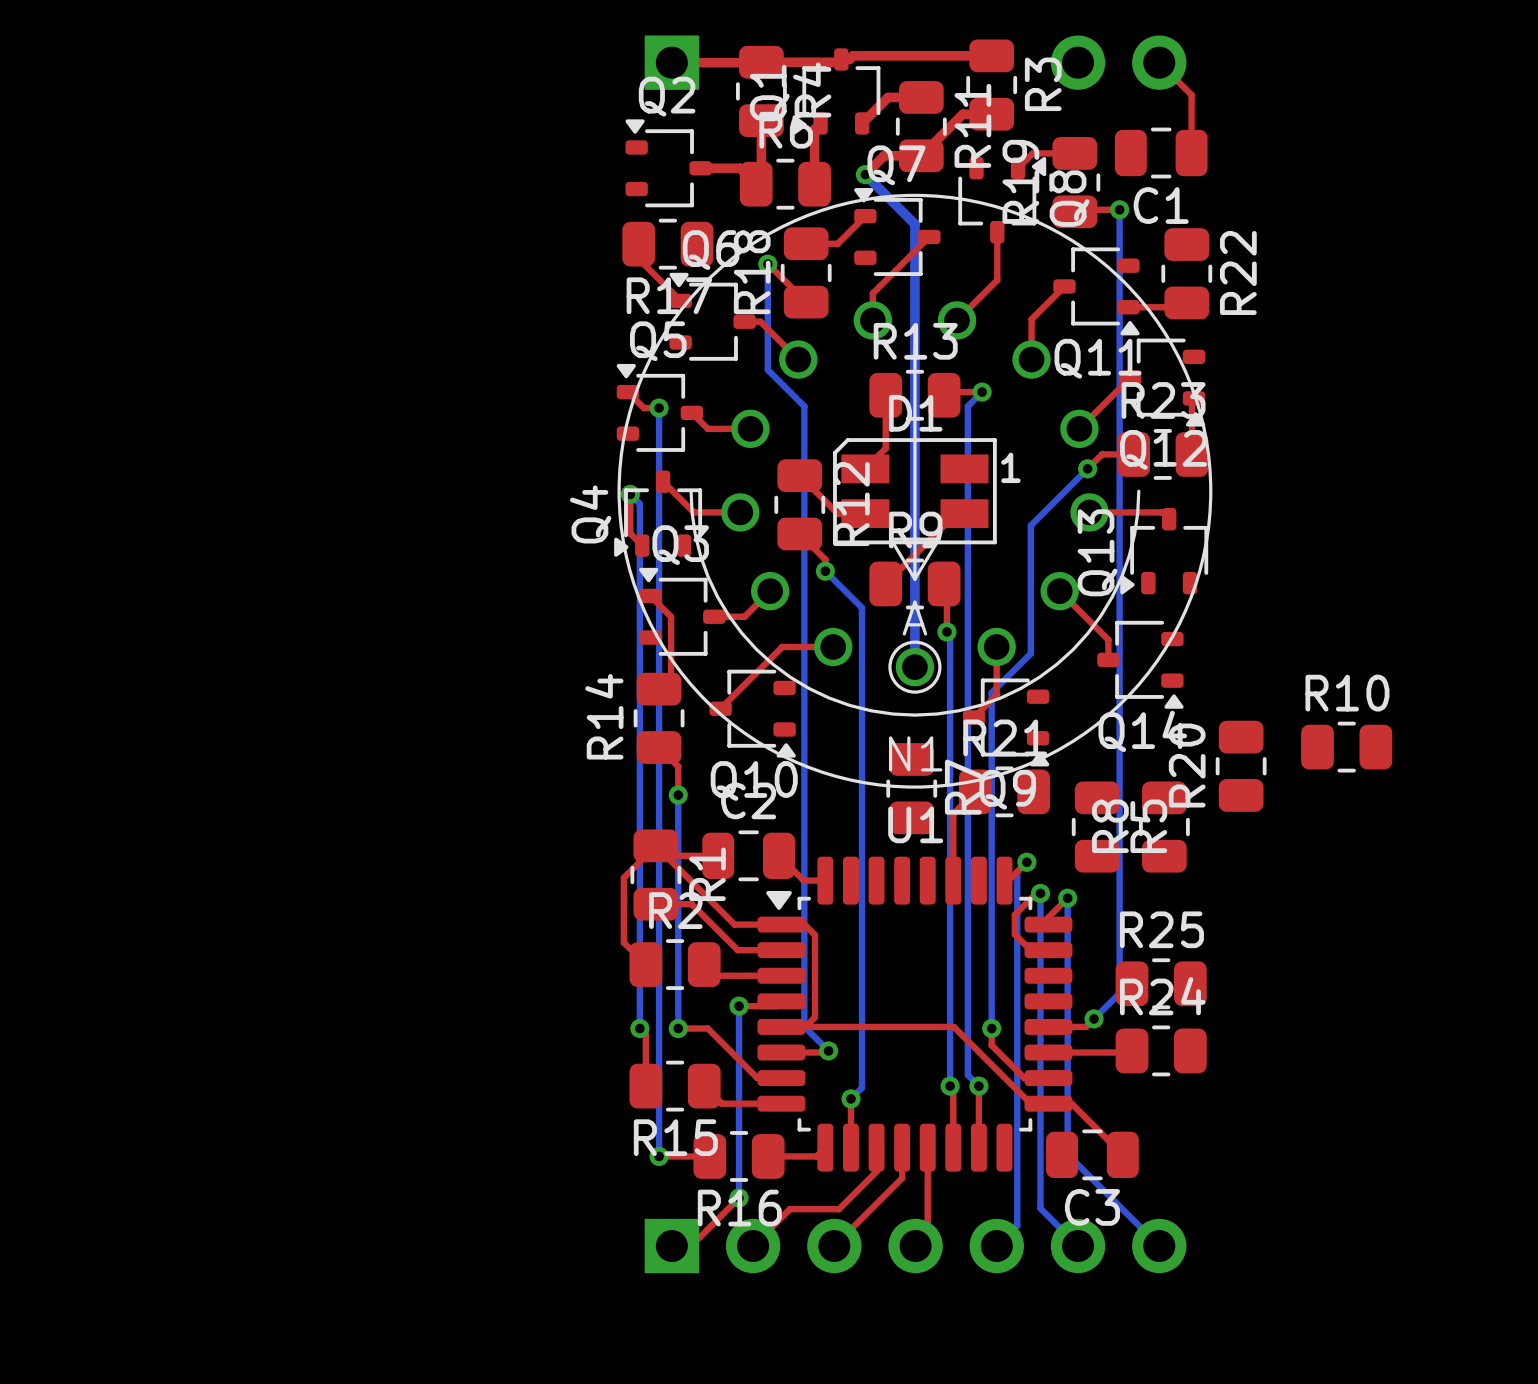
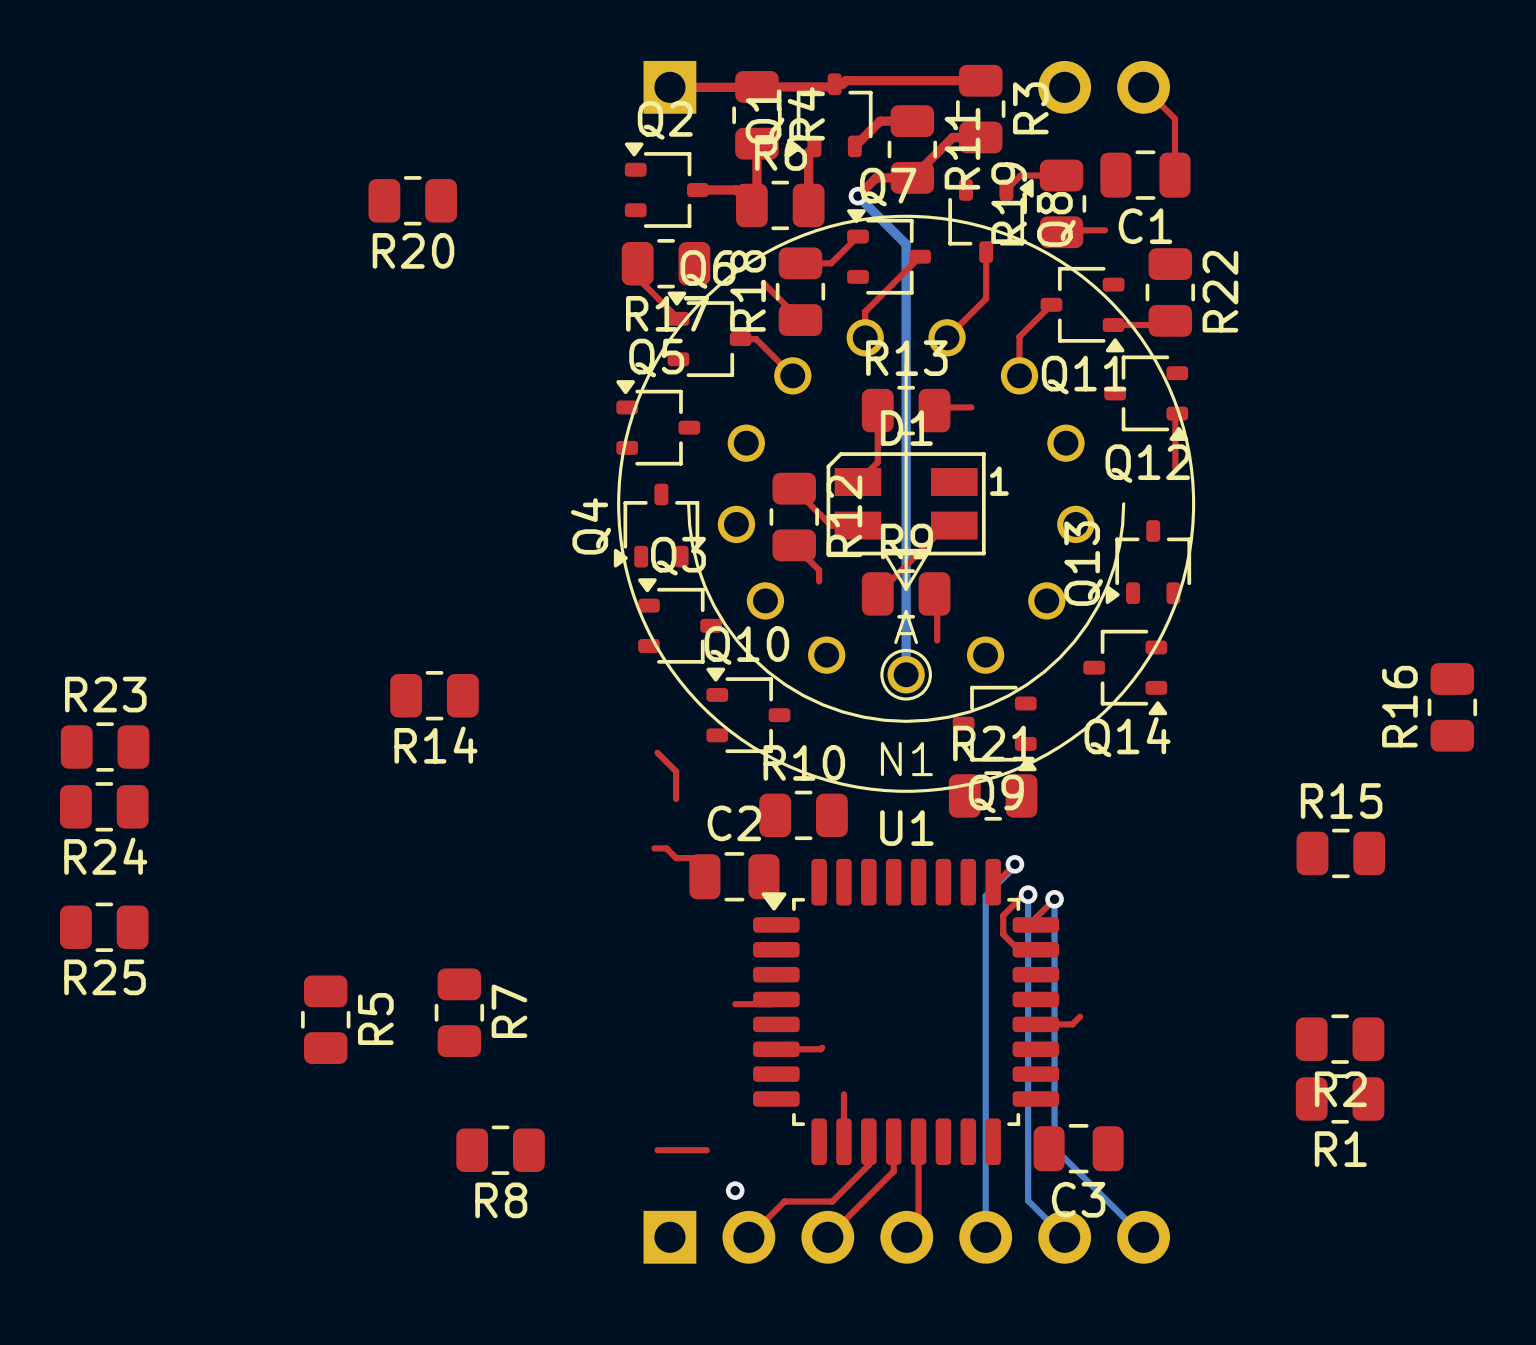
bottom track: (1119, 209) (1119, 993) (1094, 1018) -> none
via: (1119, 209) -> none
bottom track: (767, 264) (767, 369) (804, 406) (804, 1026) (828, 1050) -> none
via: (767, 264) -> none
top track: (1130, 378) (1079, 428) -> none
top track: (627, 392) (643, 408) (659, 408) -> none
bottom track: (982, 392) (967, 406) (967, 1075) (978, 1086) -> none
via: (982, 392) -> none
bottom track: (659, 408) (659, 1156) -> none
via: (659, 408) -> none
top track: (691, 412) (707, 428) (750, 428) -> none
top track: (1133, 454) (1102, 454) (1087, 468) -> none
R23 position: (1162, 454) -> (105, 747)
bottom track: (1087, 468) (1030, 525) (1030, 653) (991, 692) (991, 1028) -> none
via: (1087, 468) -> none
top track: (663, 481) (693, 512) (740, 512) -> none
top track: (630, 494) (630, 533) (642, 545) -> none
bottom track: (630, 494) (639, 504) (639, 1028) -> none
via: (630, 494) -> none
top track: (1089, 512) (1162, 512) (1169, 519) -> none
bottom track: (825, 571) (862, 607) (862, 1087) (850, 1098) -> none
via: (825, 571) -> none
top track: (770, 591) (744, 616) (714, 616) -> none
top track: (1059, 591) (1108, 639) (1108, 659) -> none
top track: (650, 595) (671, 616) (671, 677) (659, 689) -> none
bottom track: (946, 631) (950, 635) (950, 1086) -> none
via: (946, 631) -> none
top track: (996, 646) (996, 694) (974, 717) -> none
top track: (833, 660) (833, 646) (782, 646) (720, 708) -> none
Q10 rotation: 0° (752, 713) -> 180° (748, 710)
R14 name position: R14 (604, 716) -> R14 (435, 745)
R14 rotation: 0° (659, 718) -> 90° clockwise (434, 695)
R14 position: (659, 718) -> (434, 695)
R10 position: (1346, 747) -> (803, 815)
R20 name position: R20 (1187, 765) -> R20 (413, 250)
R20 rotation: 0° (1241, 766) -> 90° clockwise (412, 200)
R20 position: (1241, 766) -> (412, 200)
R7 position: (911, 788) -> (459, 1012)
top track: (975, 791) (953, 813) (953, 880) -> none
bottom track: (678, 795) (678, 1028) -> none
via: (678, 795) -> none
R8 name position: R8 (1110, 826) -> R8 (501, 1200)
R5 position: (1097, 827) -> (325, 1019)
R8 rotation: 0° (1164, 827) -> 90° clockwise (500, 1150)
R8 position: (1164, 827) -> (500, 1150)
C2 position: (748, 855) -> (734, 876)
top track: (779, 855) (803, 880) (825, 880) -> none
bottom track: (1026, 862) (1017, 871) (1017, 1225) (996, 1246) -> (1019, 861) (985, 895) (985, 1237)
R1 rotation: 0° (655, 875) -> 90° clockwise (1340, 1098)
R1 position: (655, 875) -> (1340, 1098)
top track: (655, 904) (691, 904) (737, 950) (781, 950) -> none
R2 name position: R2 (675, 910) -> R2 (1340, 1089)
R25 name position: R25 (1161, 929) -> R25 (105, 977)
top track: (645, 964) (623, 942) (623, 877) (655, 845) (734, 924) (804, 924) (815, 935) (815, 1017) (805, 1026) -> none
R2 position: (675, 964) -> (1340, 1039)
top track: (704, 964) (715, 975) (781, 975) -> none
R25 position: (1161, 983) -> (104, 927)
R24 name position: R24 (1162, 996) -> R24 (105, 856)
bottom track: (739, 1006) (739, 1198) -> none
via: (739, 1006) -> none
via: (1094, 1018) -> none
top track: (781, 1026) (953, 1026) (1030, 1103) (1071, 1103) (1122, 1154) -> none
top track: (639, 1028) (645, 1034) (645, 1086) -> none
via: (639, 1028) -> none
top track: (678, 1028) (707, 1028) (757, 1078) (781, 1078) -> none
via: (678, 1028) -> none
top track: (991, 1028) (991, 1045) (1024, 1078) (1048, 1078) -> none
via: (991, 1028) -> none
via: (828, 1050) -> none
top track: (1132, 1050) (1130, 1052) (1048, 1052) -> none
R24 position: (1161, 1050) -> (104, 806)
R15 position: (675, 1086) -> (1340, 853)
top track: (704, 1086) (721, 1103) (781, 1103) -> none
top track: (950, 1086) (953, 1089) (953, 1147) -> none
via: (950, 1086) -> none
top track: (978, 1086) (978, 1147) -> none
via: (978, 1086) -> none
via: (850, 1098) -> none
R15 name position: R15 (675, 1137) -> R15 (1341, 801)
top track: (825, 1147) (816, 1156) (768, 1156) -> none
via: (659, 1156) -> none
R16 rotation: 0° (739, 1156) -> 90° clockwise (1452, 707)
R16 position: (739, 1156) -> (1452, 707)
top track: (739, 1198) (691, 1246) (671, 1246) -> none

